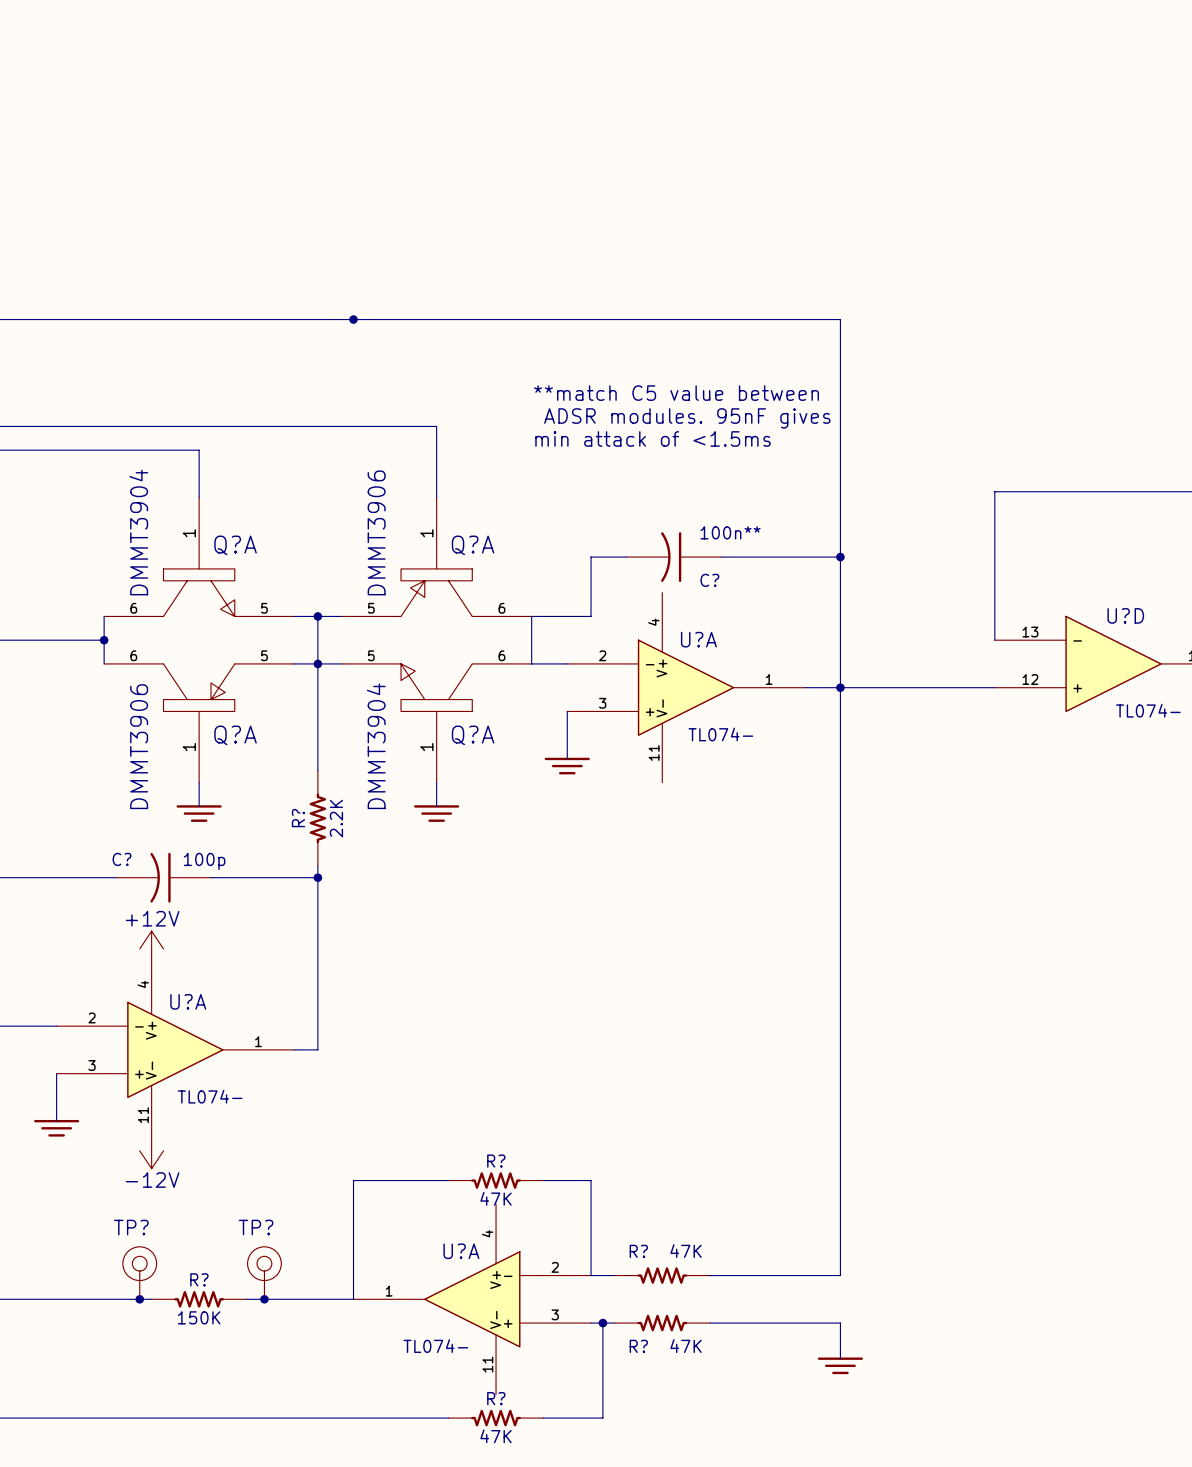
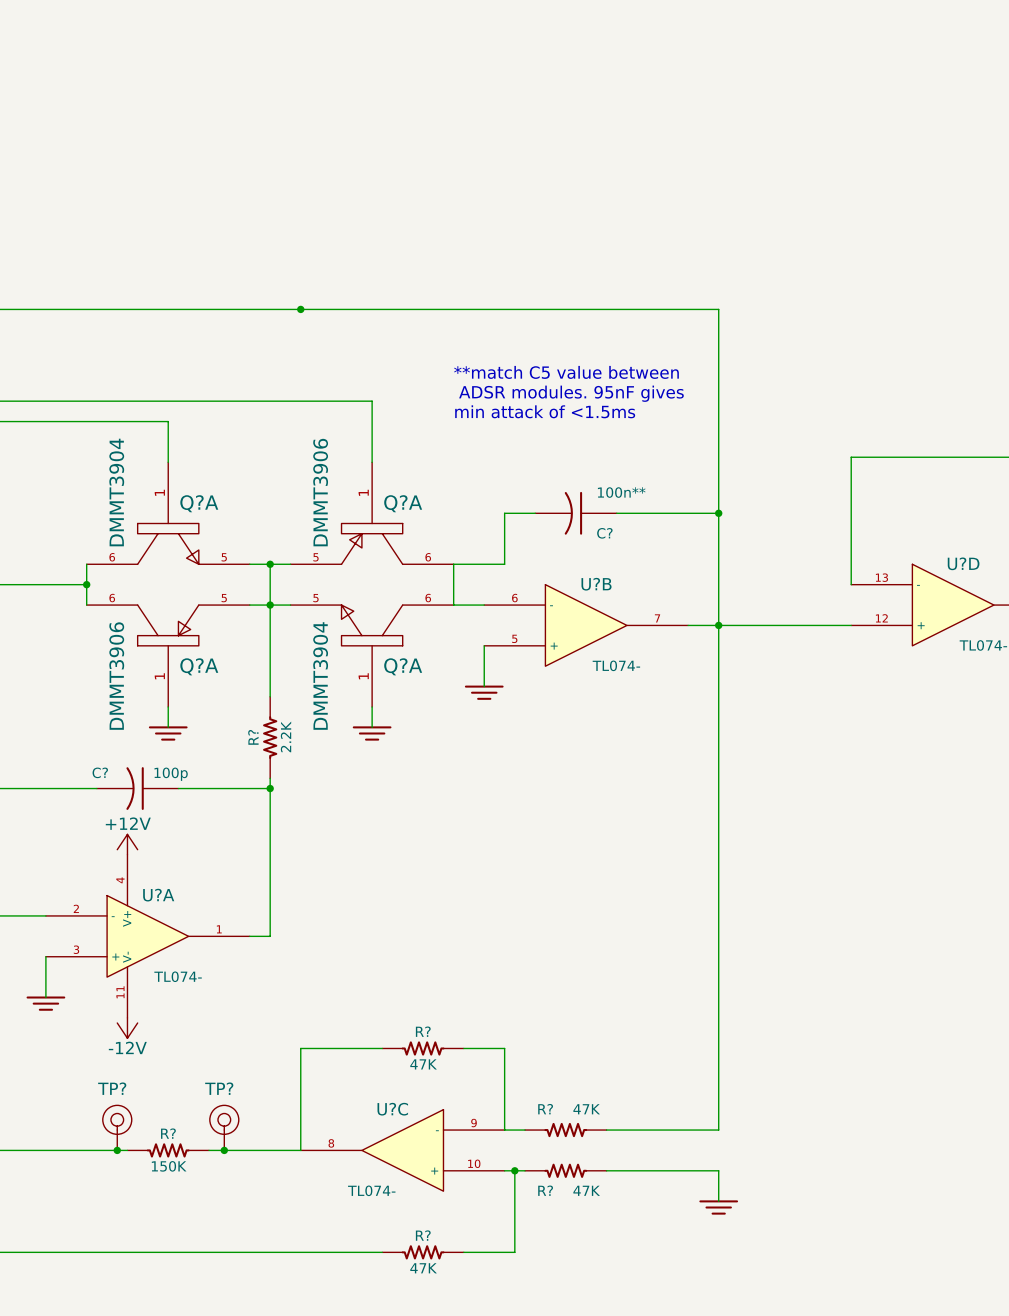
U?A: TL074- (686, 687) -> none
U?B: none -> TL074- (586, 625)
U?A: TL074- (472, 1299) -> none
U?C: none -> TL074- (402, 1150)

